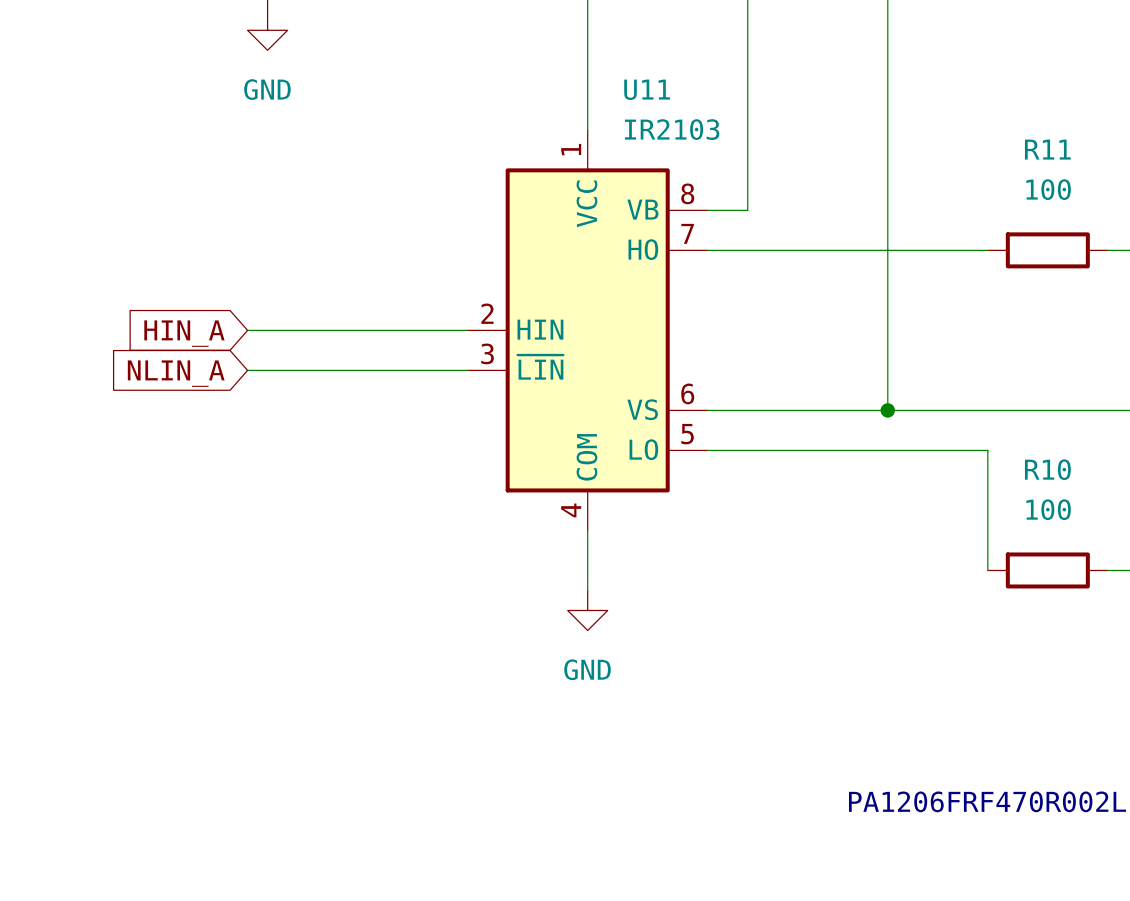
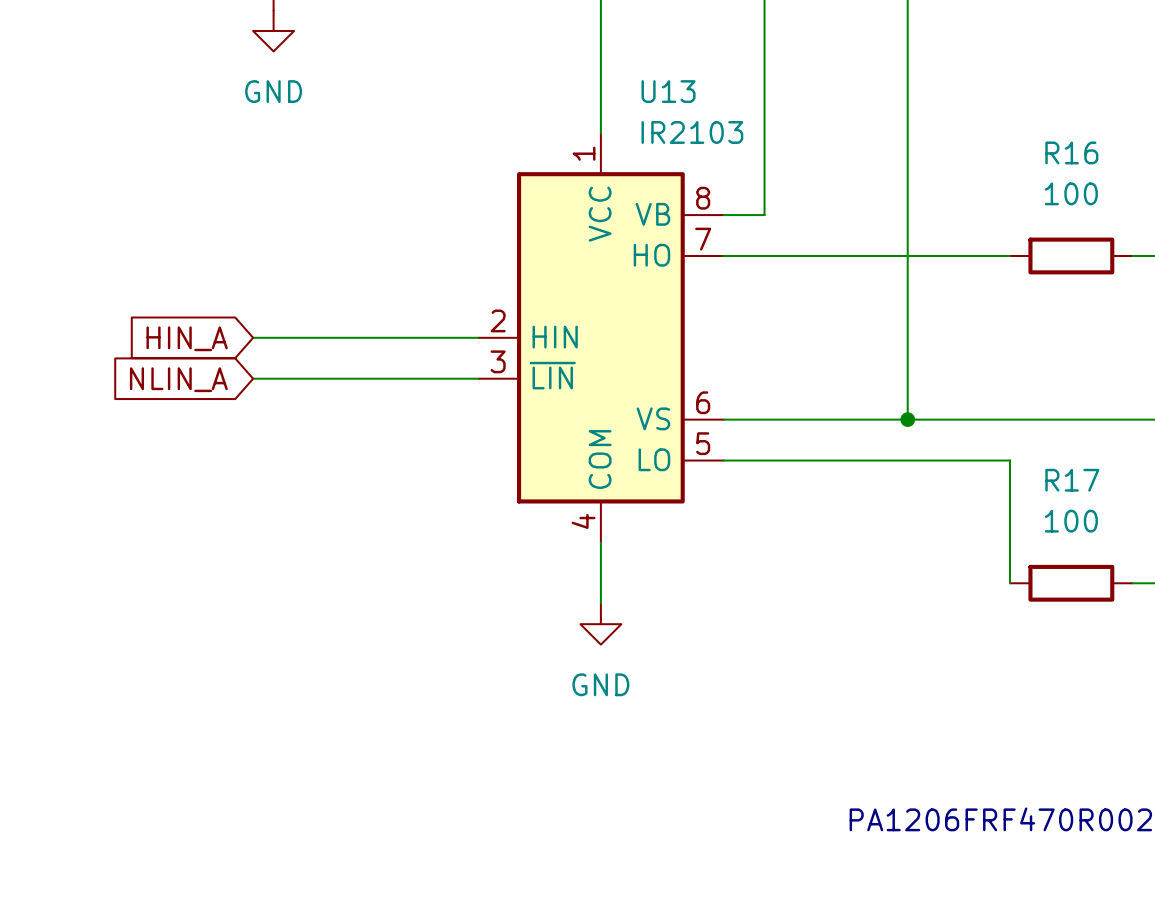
U11 name: U11 (647, 89) -> U13 (668, 91)
R11 name: R11 (1047, 149) -> R16 (1071, 152)
R10 name: R10 (1047, 469) -> R17 (1072, 480)

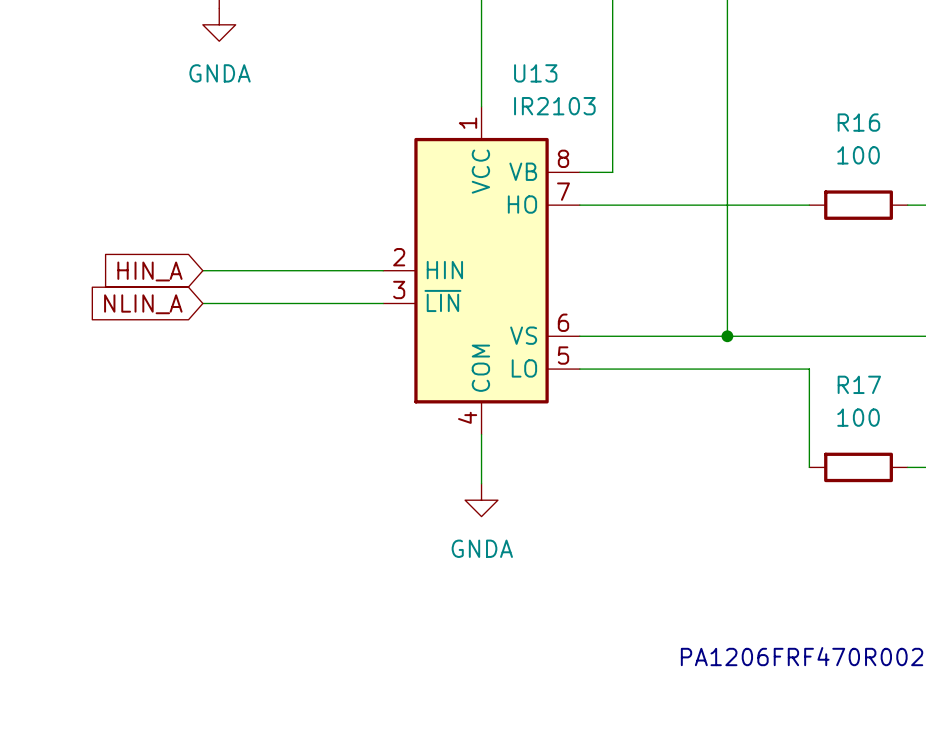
power symbol: GND (273, 30) -> GNDA (219, 24)
power symbol: GND (600, 624) -> GNDA (481, 500)

